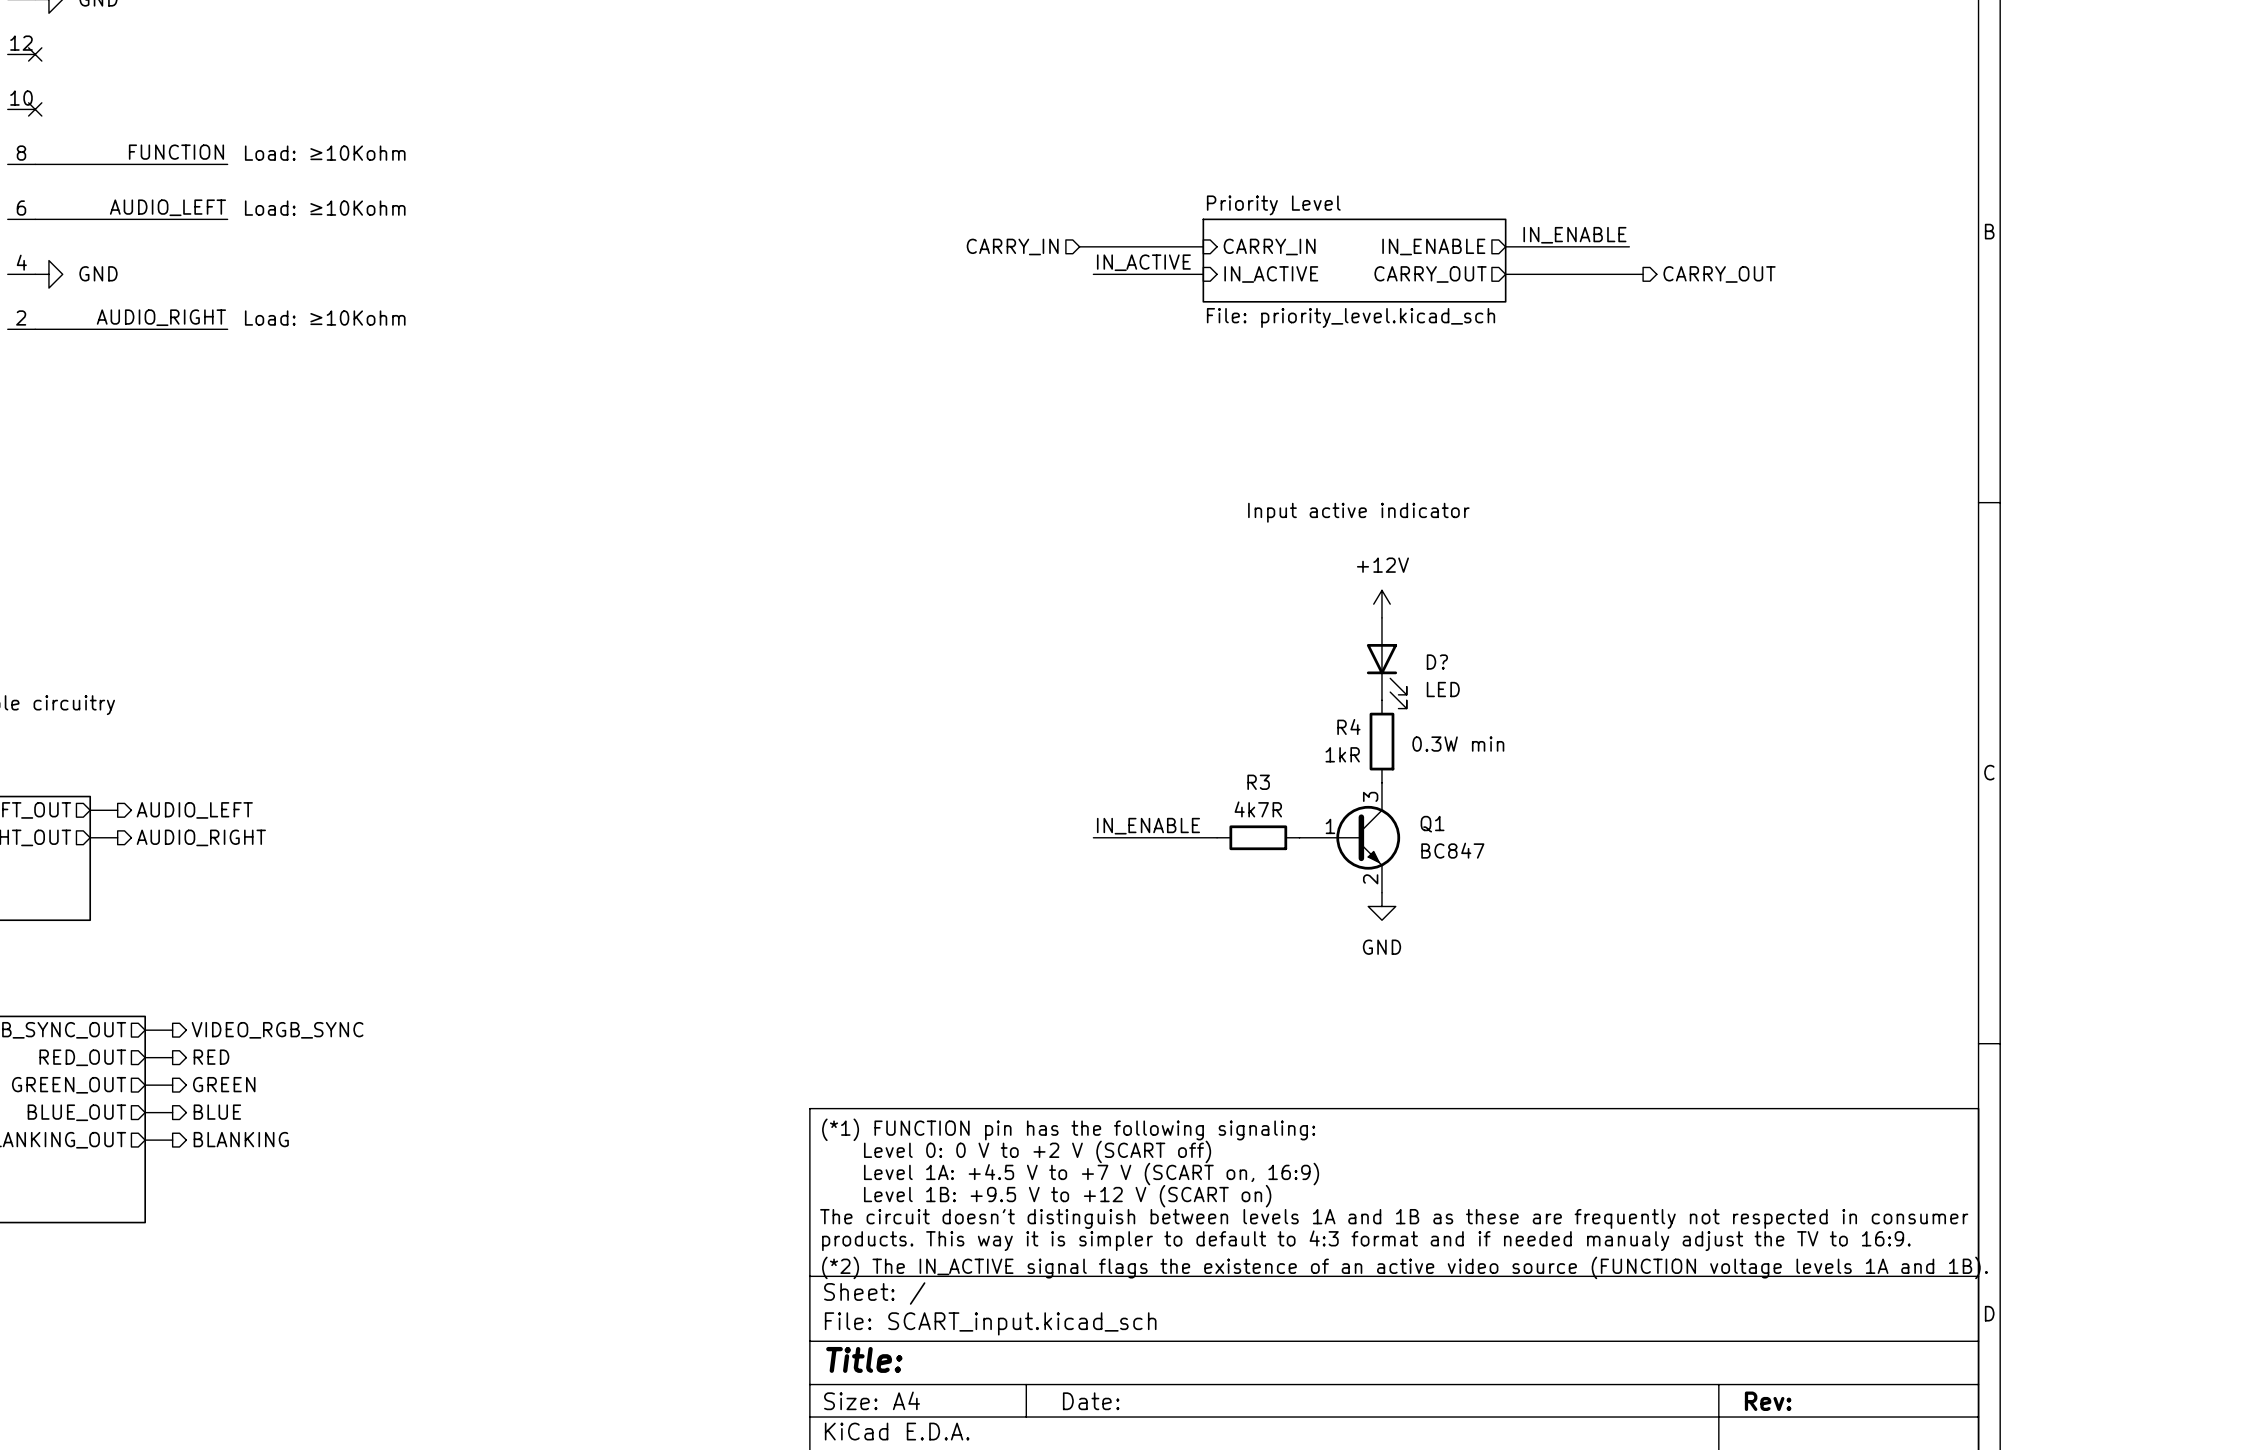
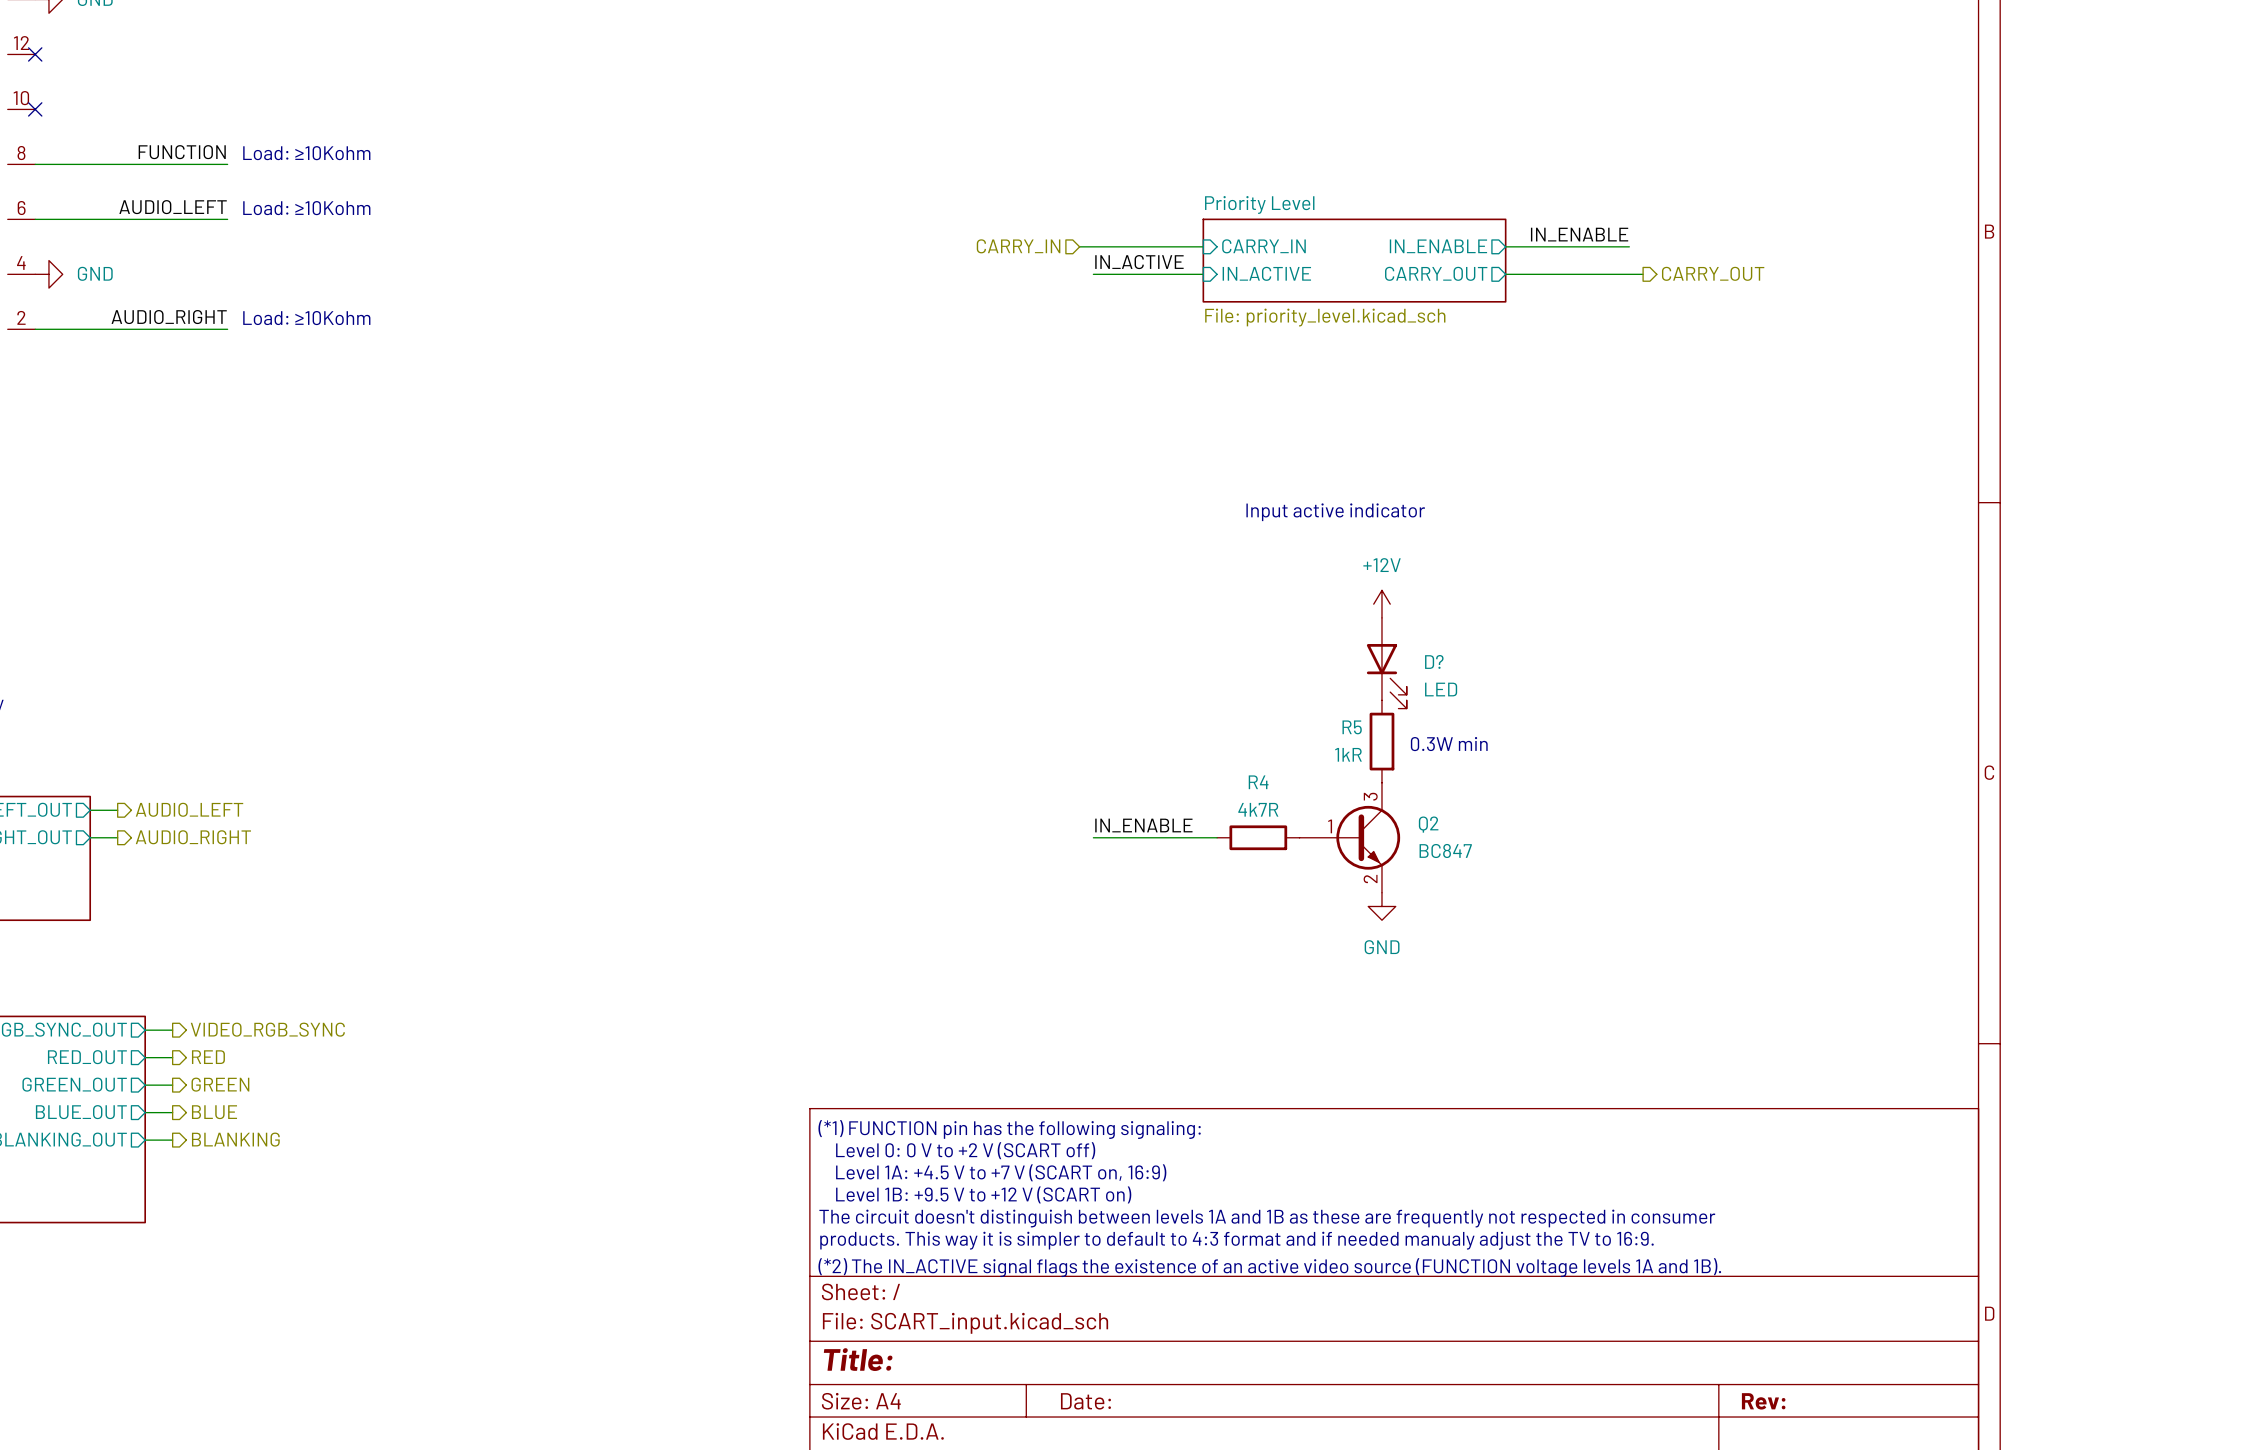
R4 name: R4 (1348, 726) -> R5 (1352, 727)
R3 name: R3 (1258, 782) -> R4 (1258, 782)
Q1 name: Q1 (1432, 824) -> Q2 (1428, 824)

